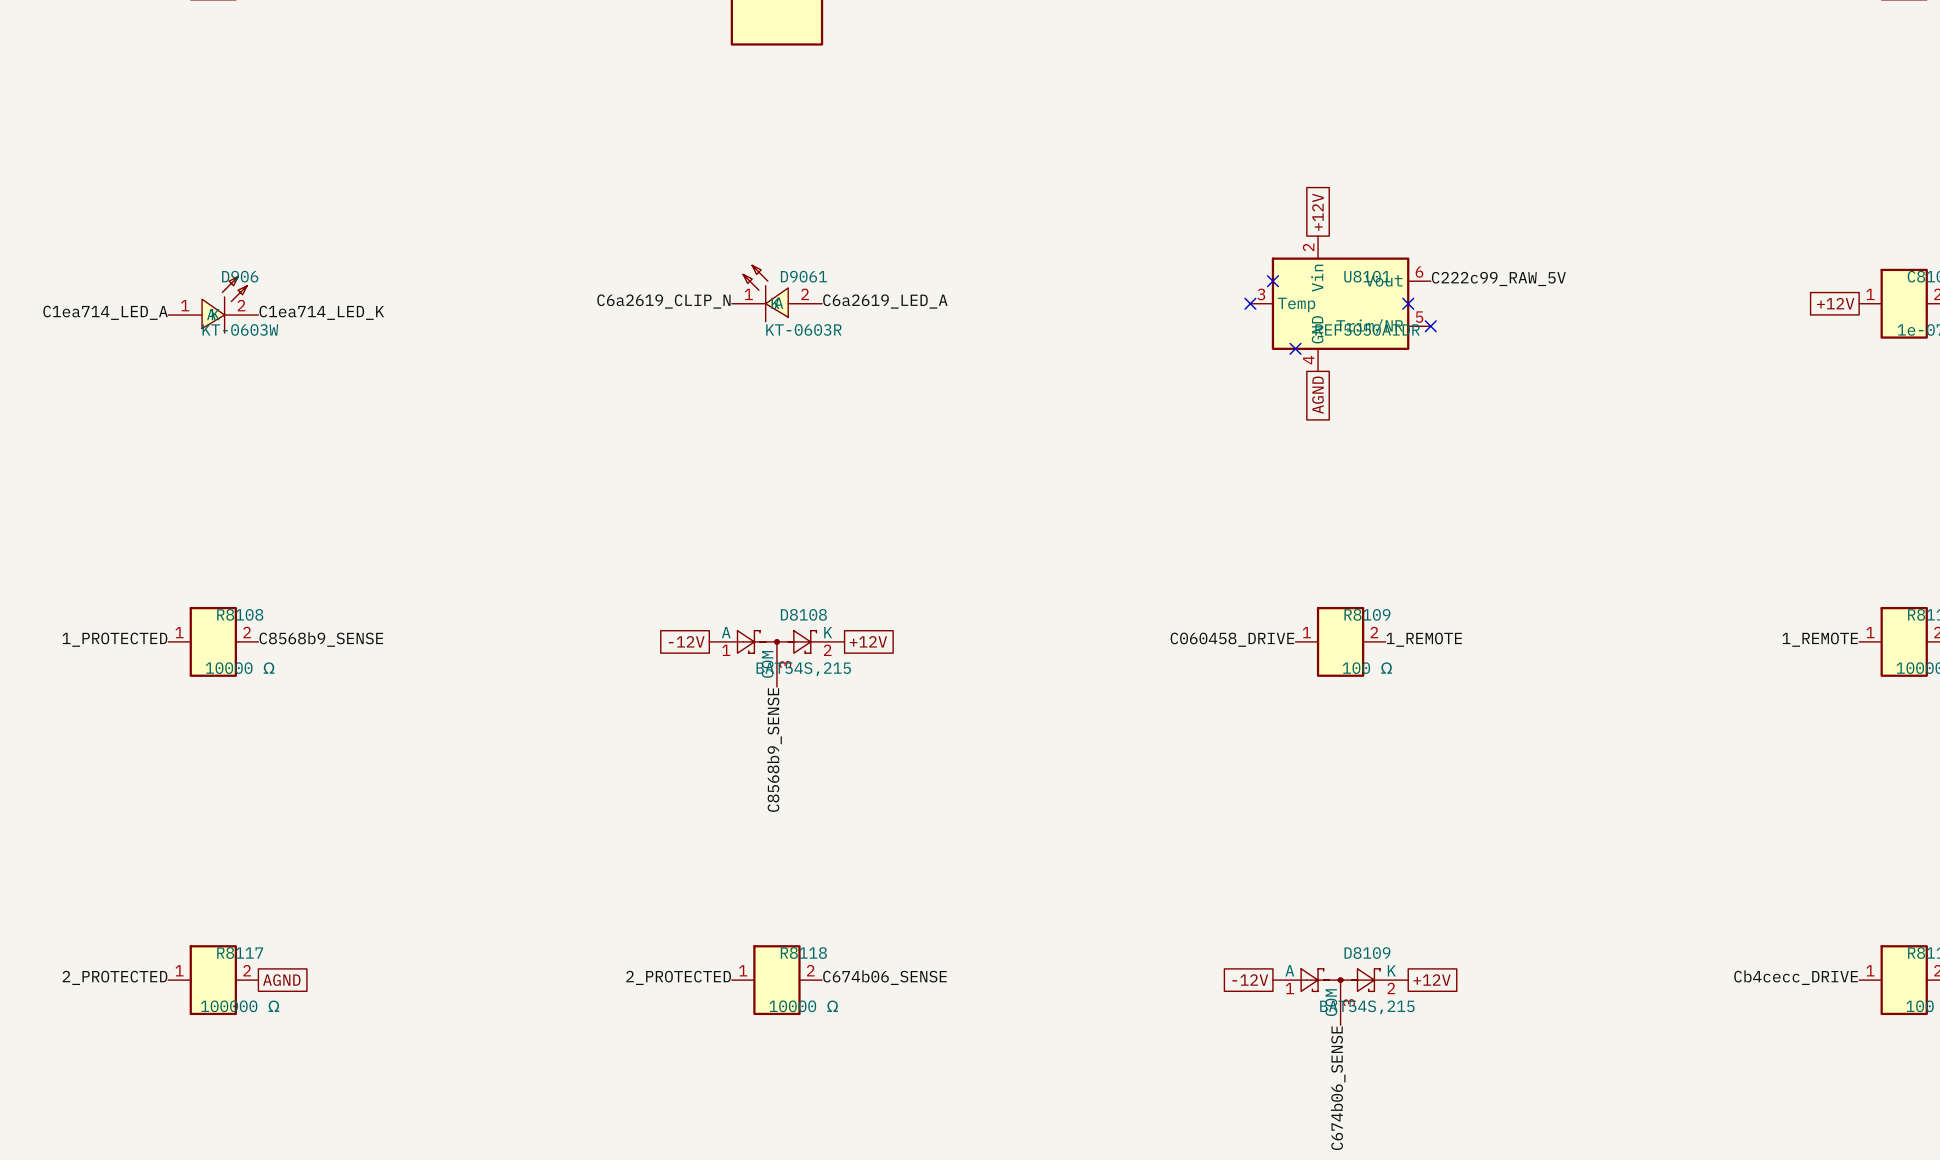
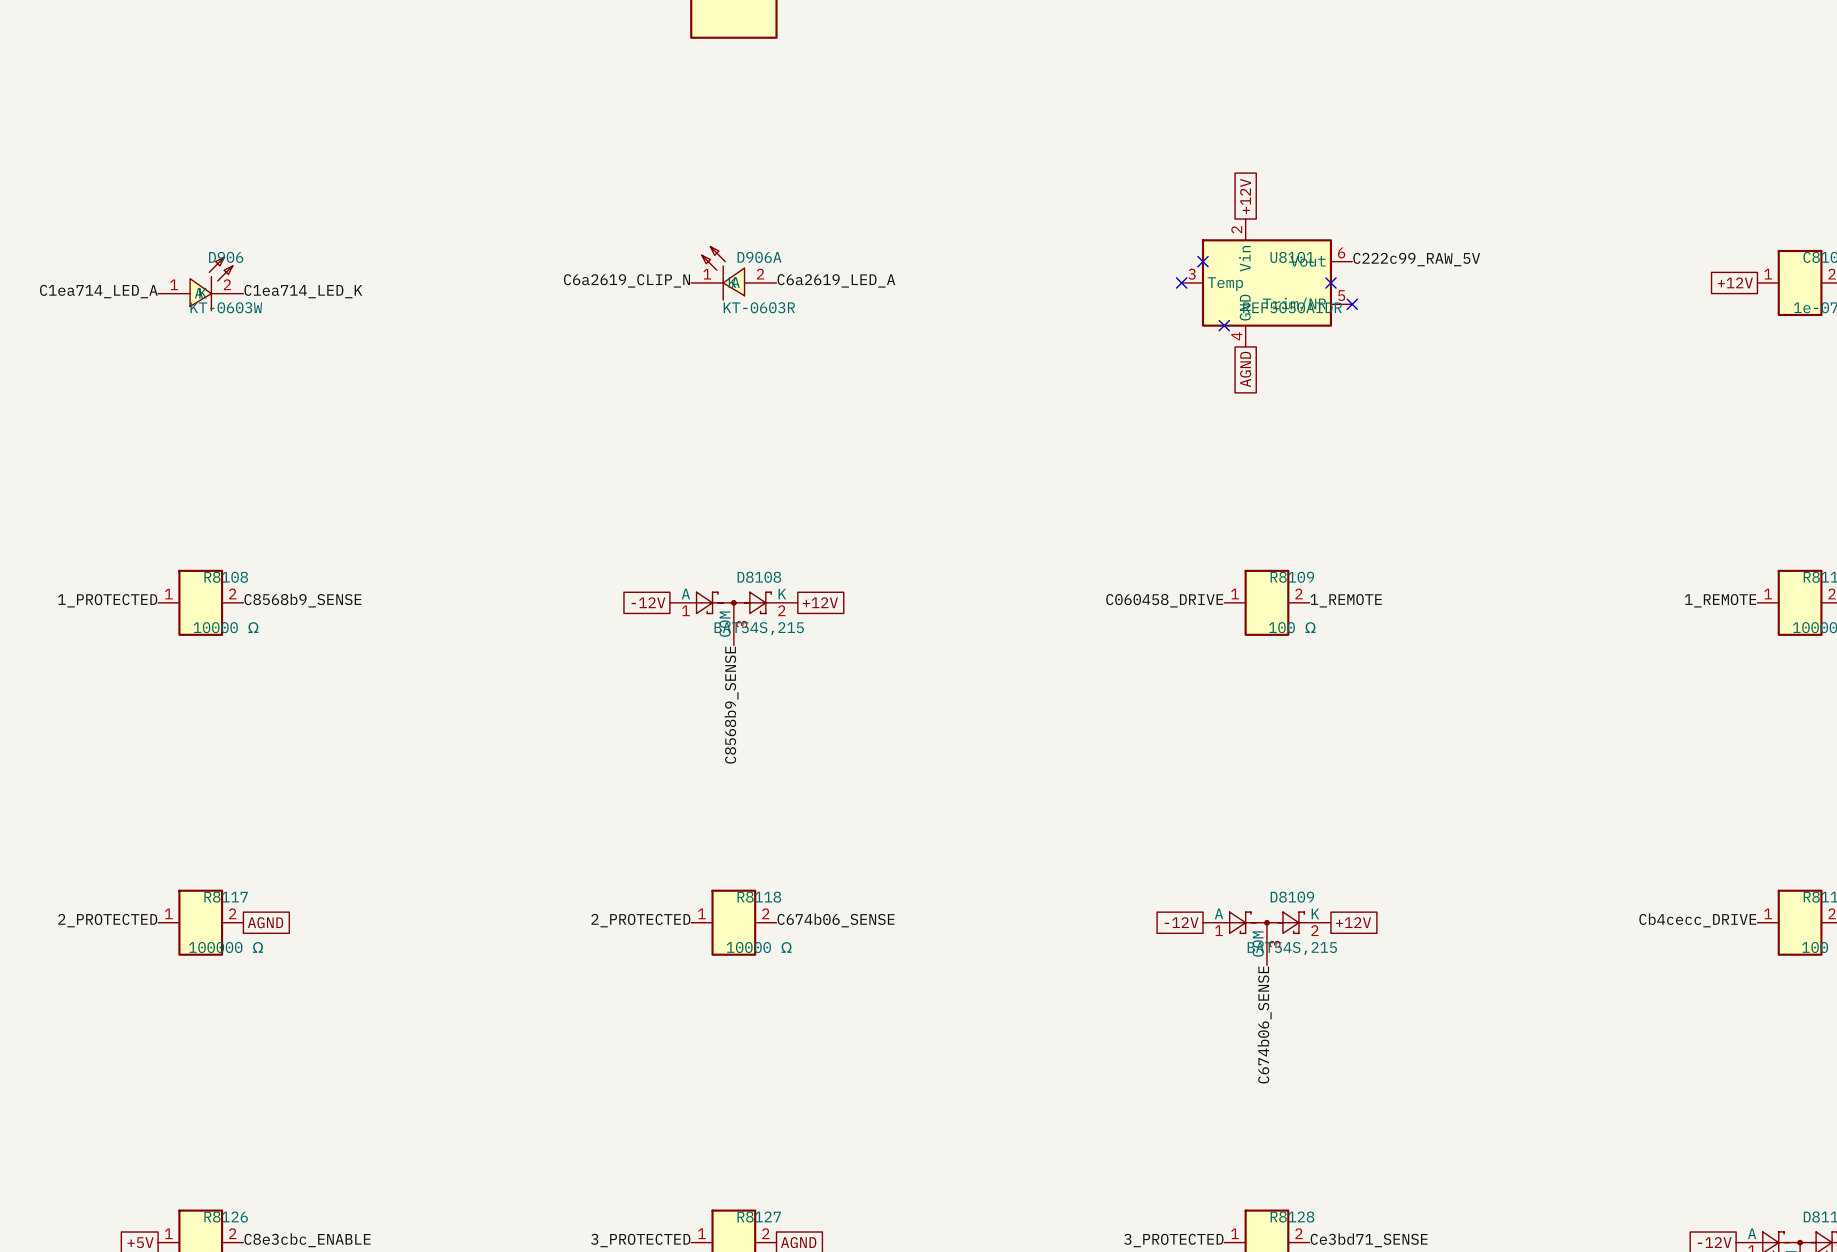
D9061 name: D9061 (803, 276) -> D906A (759, 257)

